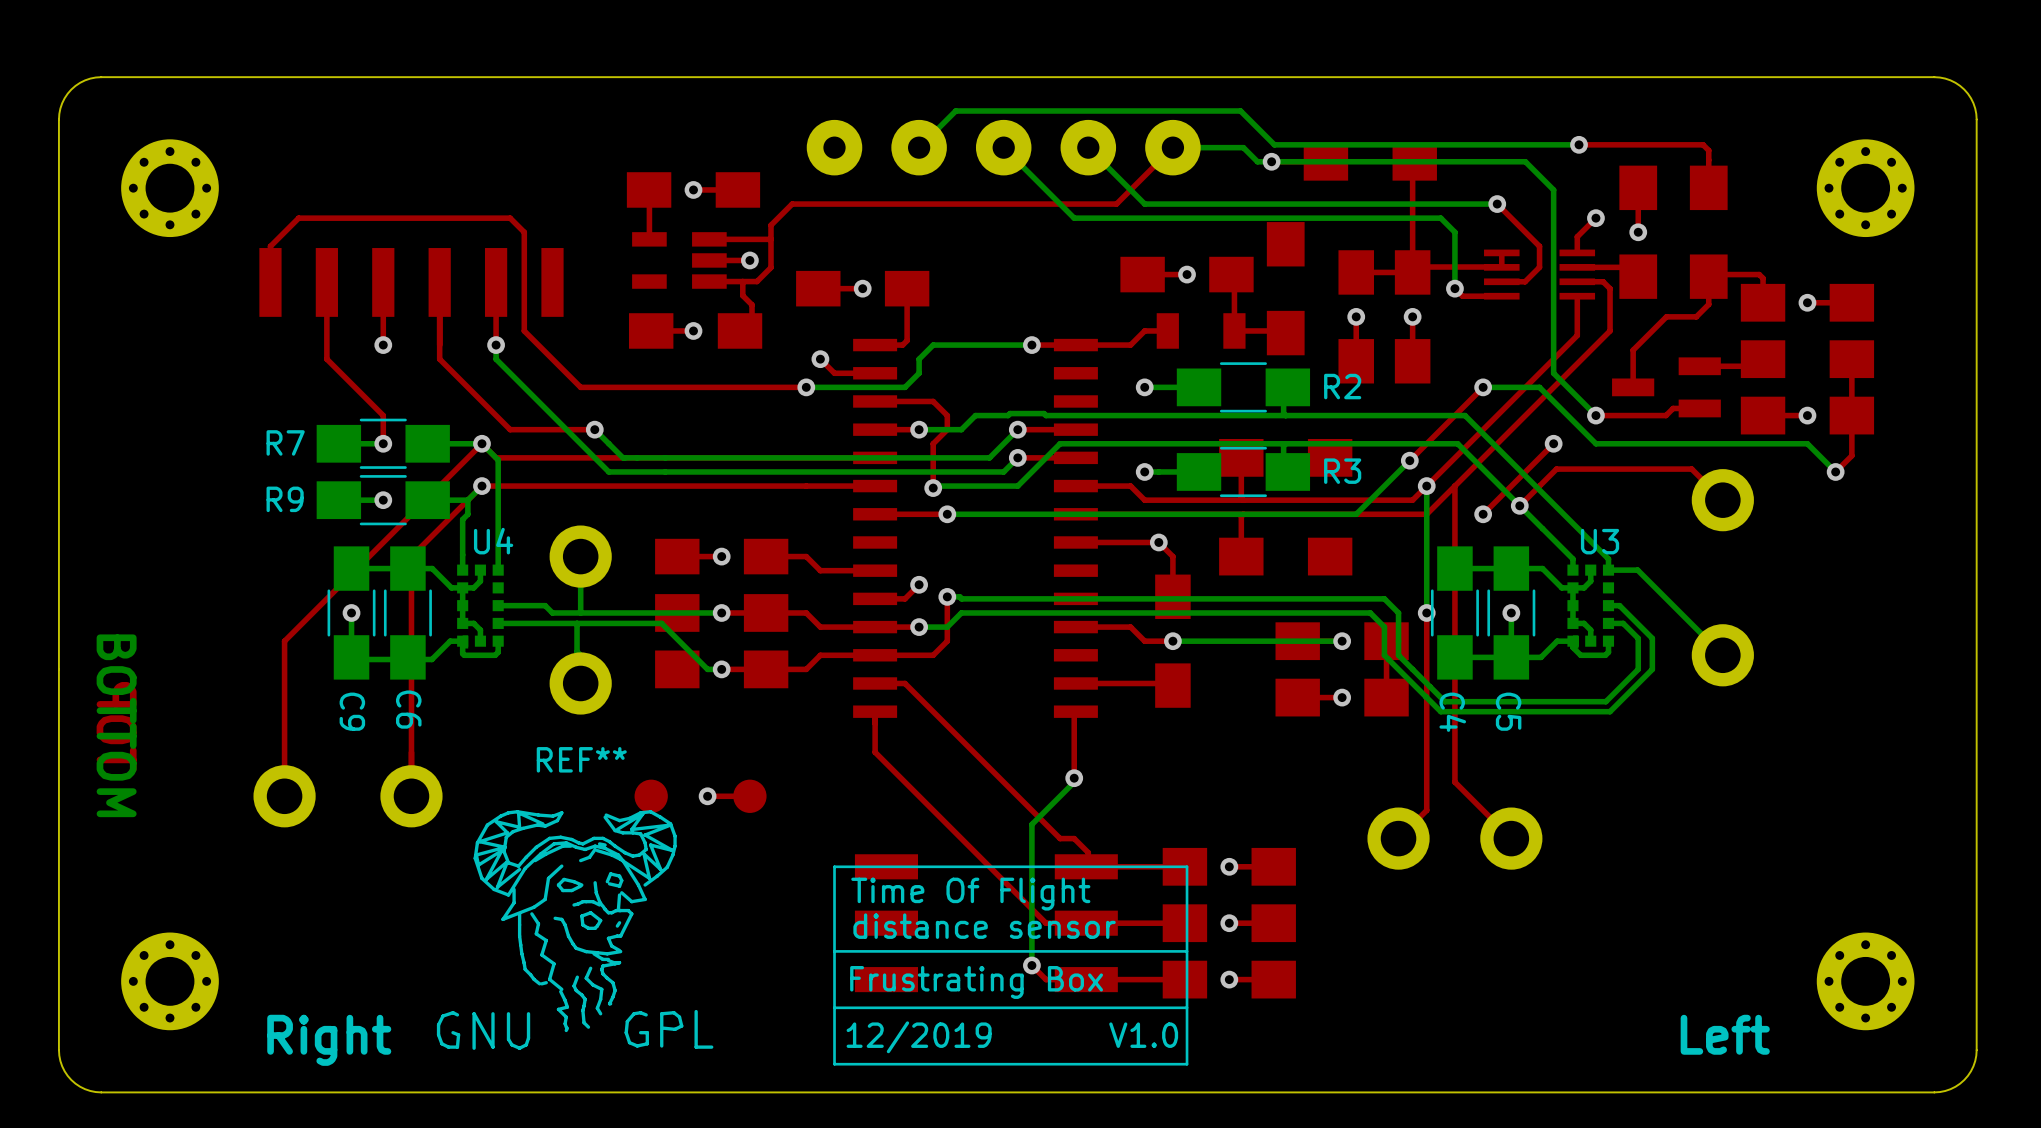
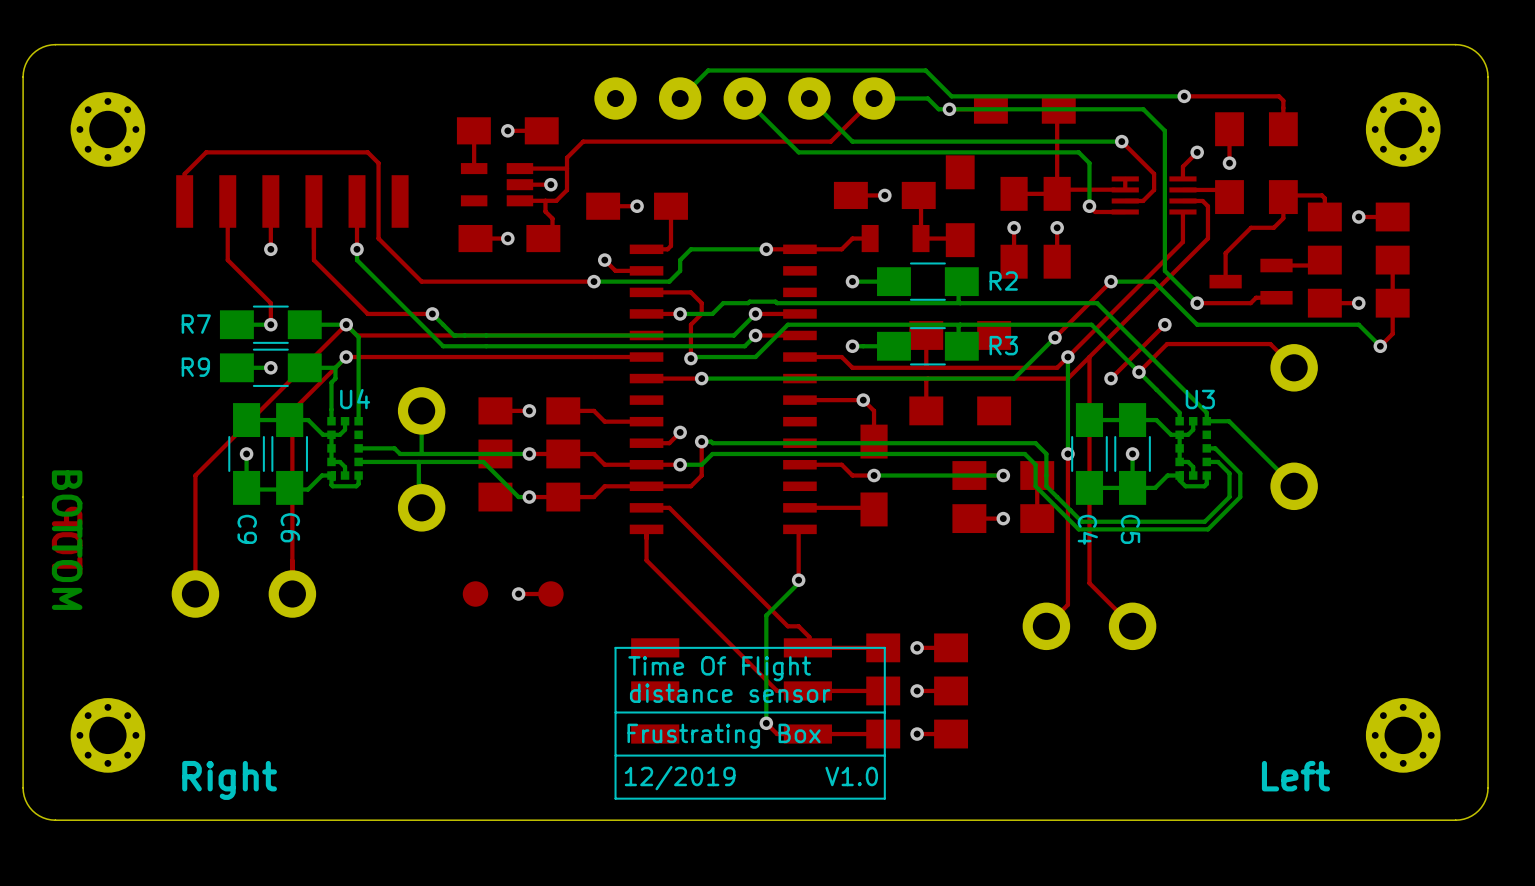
REF**: (575, 930) -> none

